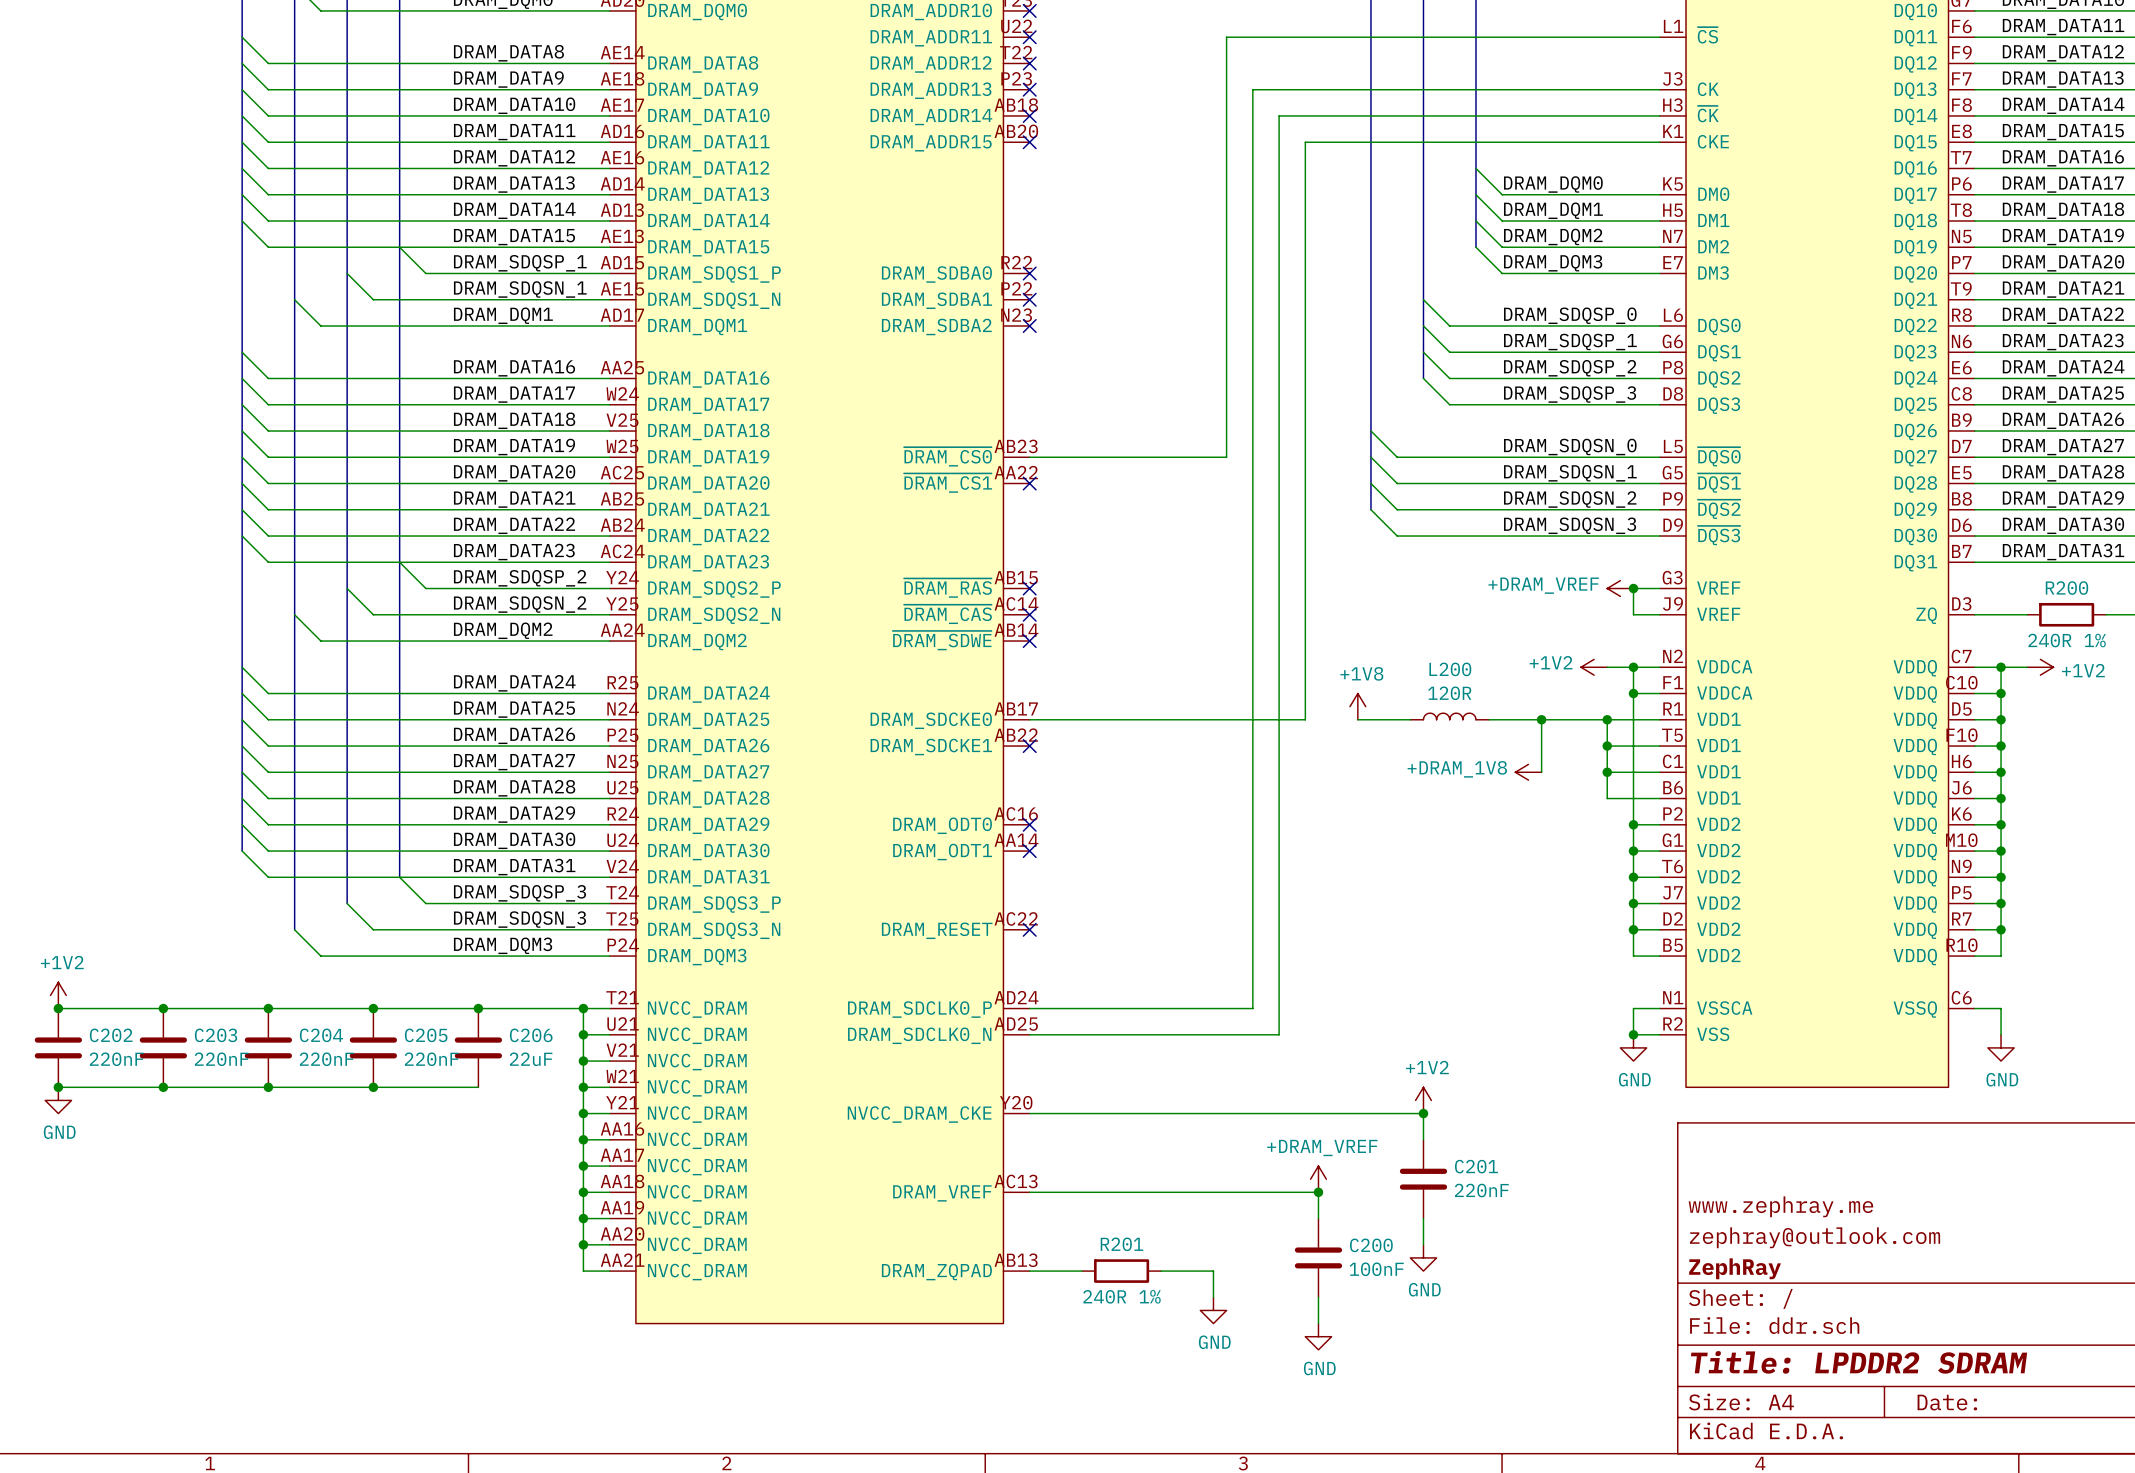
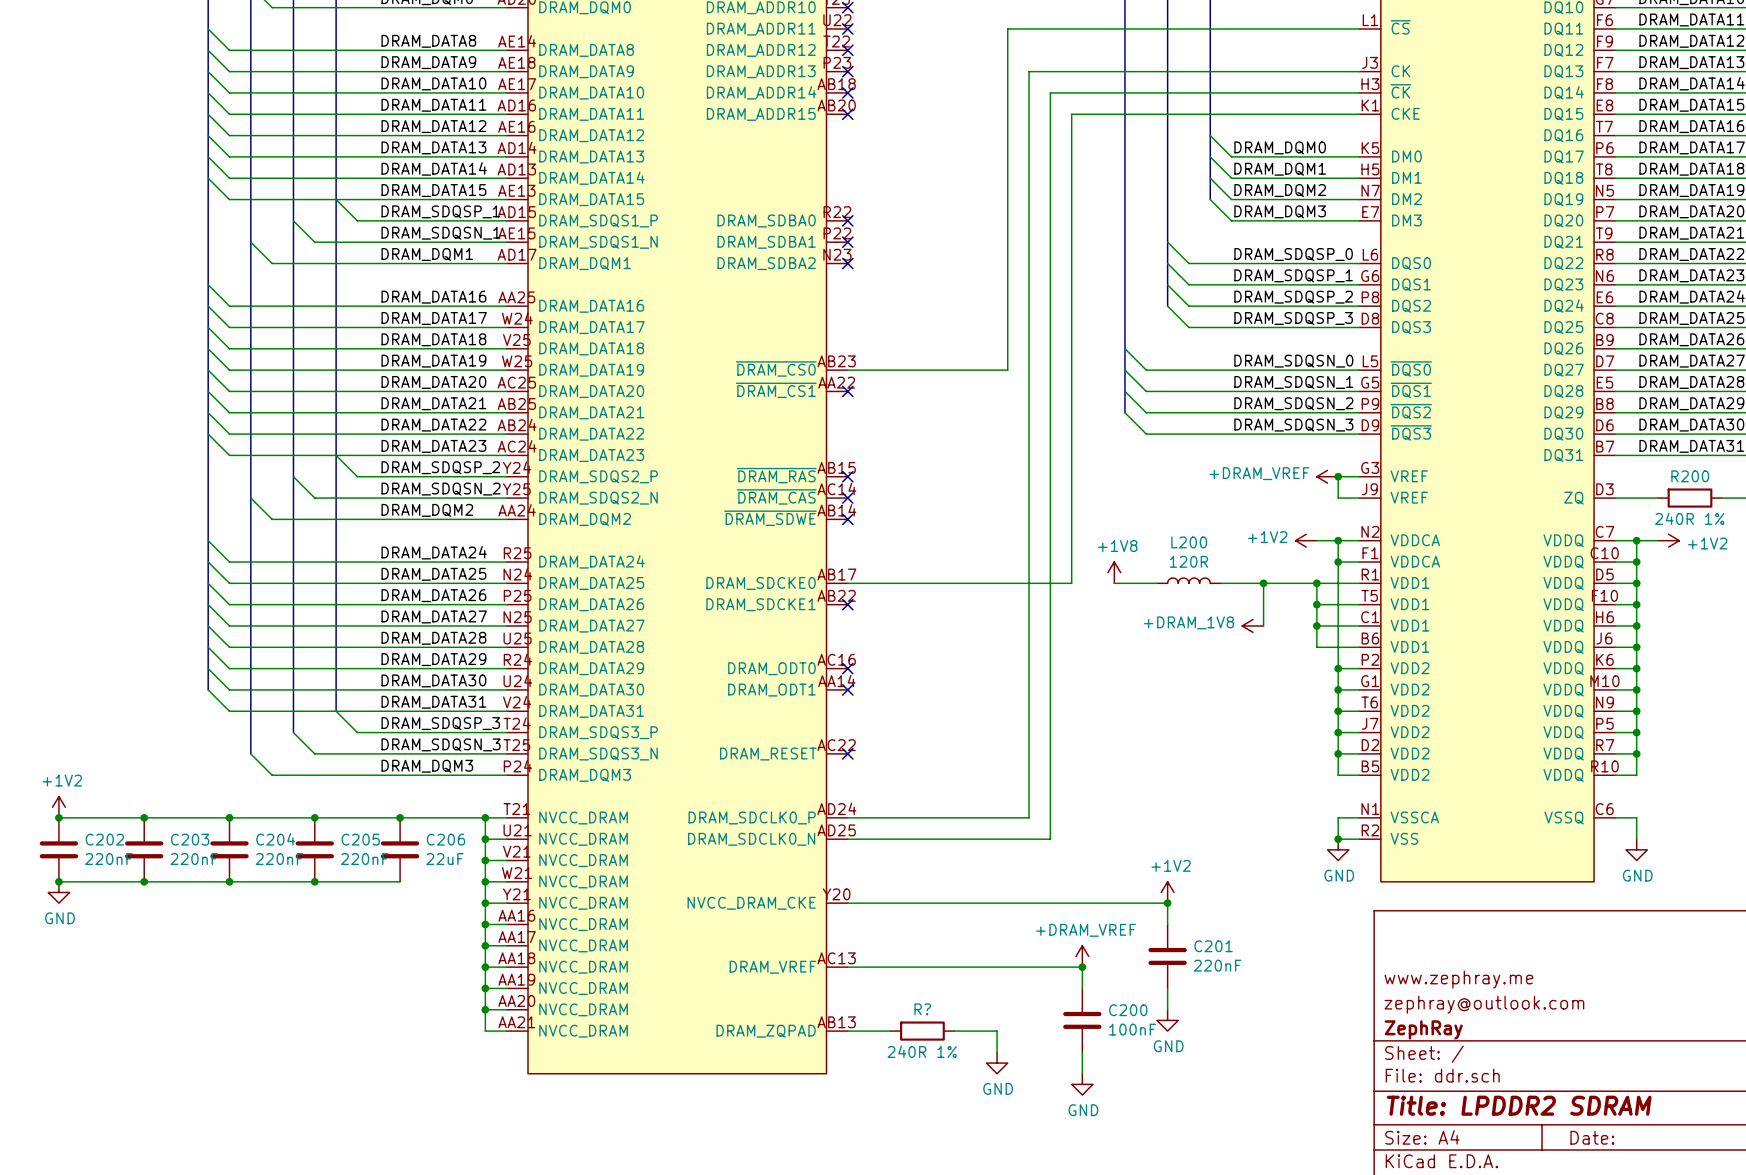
R201 name: R201 (1121, 1244) -> R? (922, 1009)

